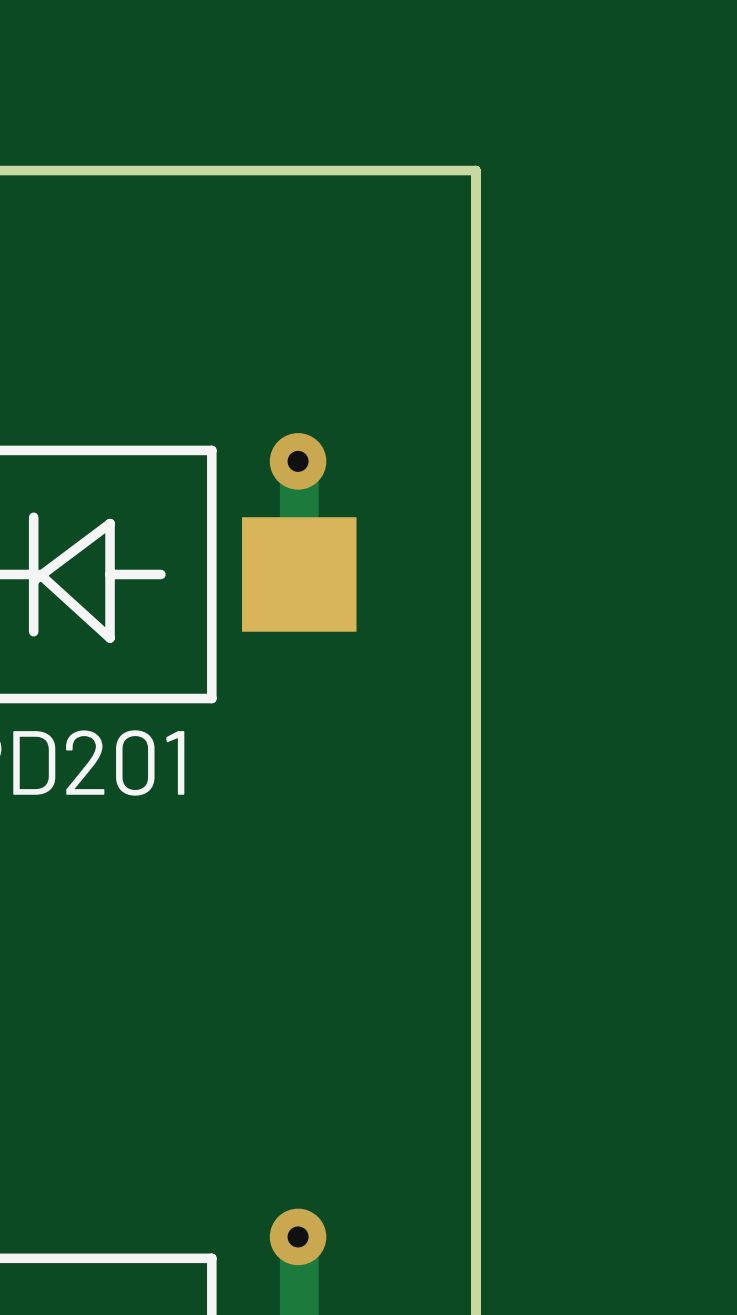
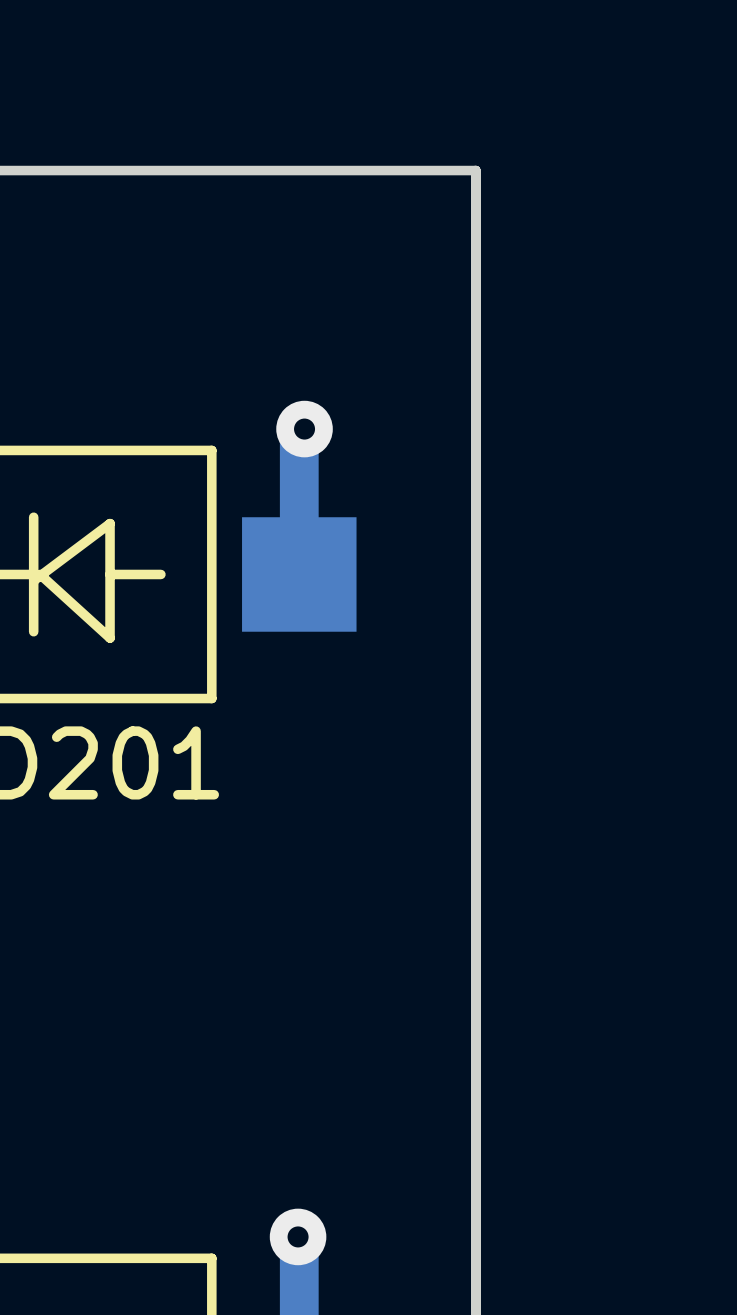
via position: (298, 461) -> (304, 429)

